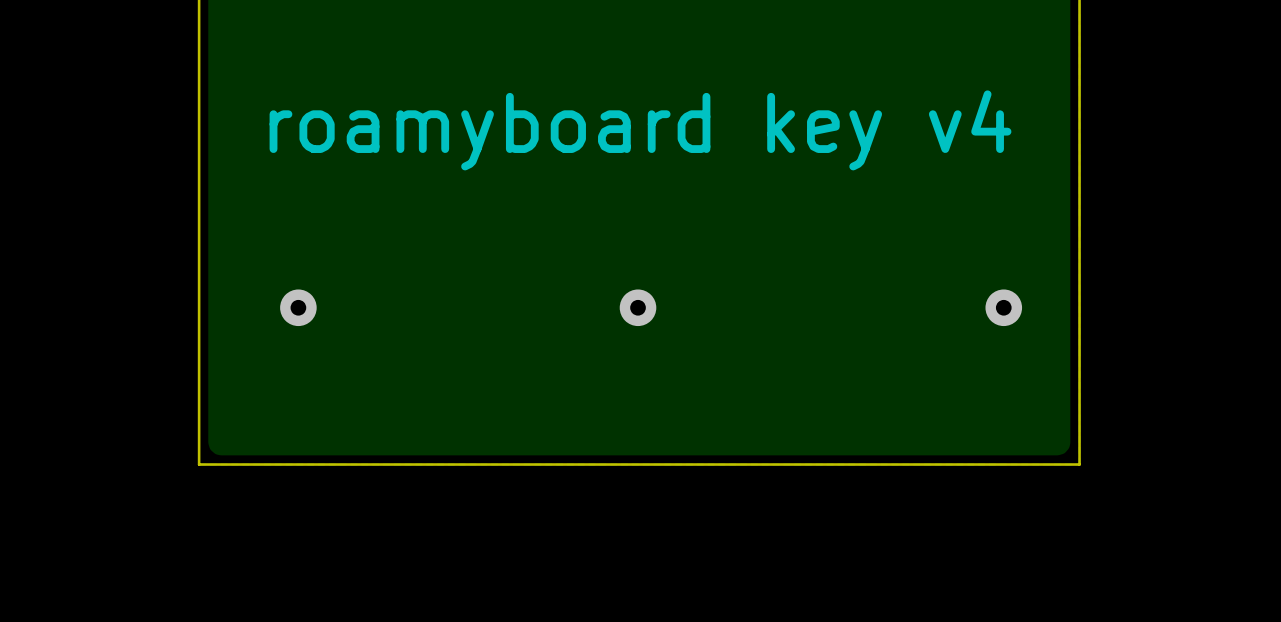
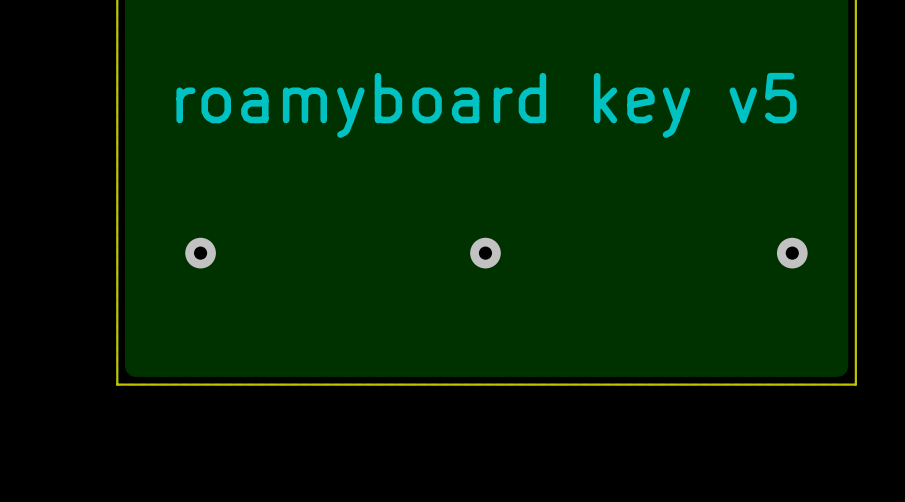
text: roamyboard key v4 (640, 130) -> roamyboard key v5 (486, 105)

